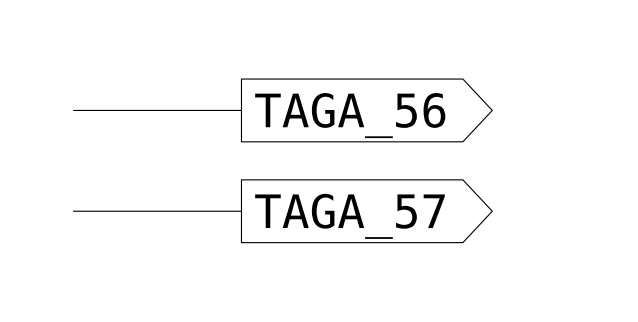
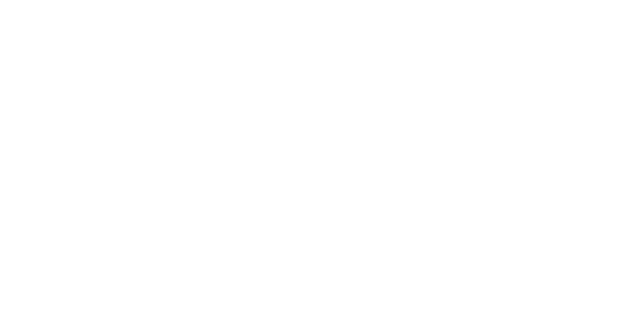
wire: (73, 110) (241, 110) -> none
global label: TAGA_56 (350, 115) -> none
wire: (73, 211) (241, 211) -> none
global label: TAGA_57 (349, 216) -> none

